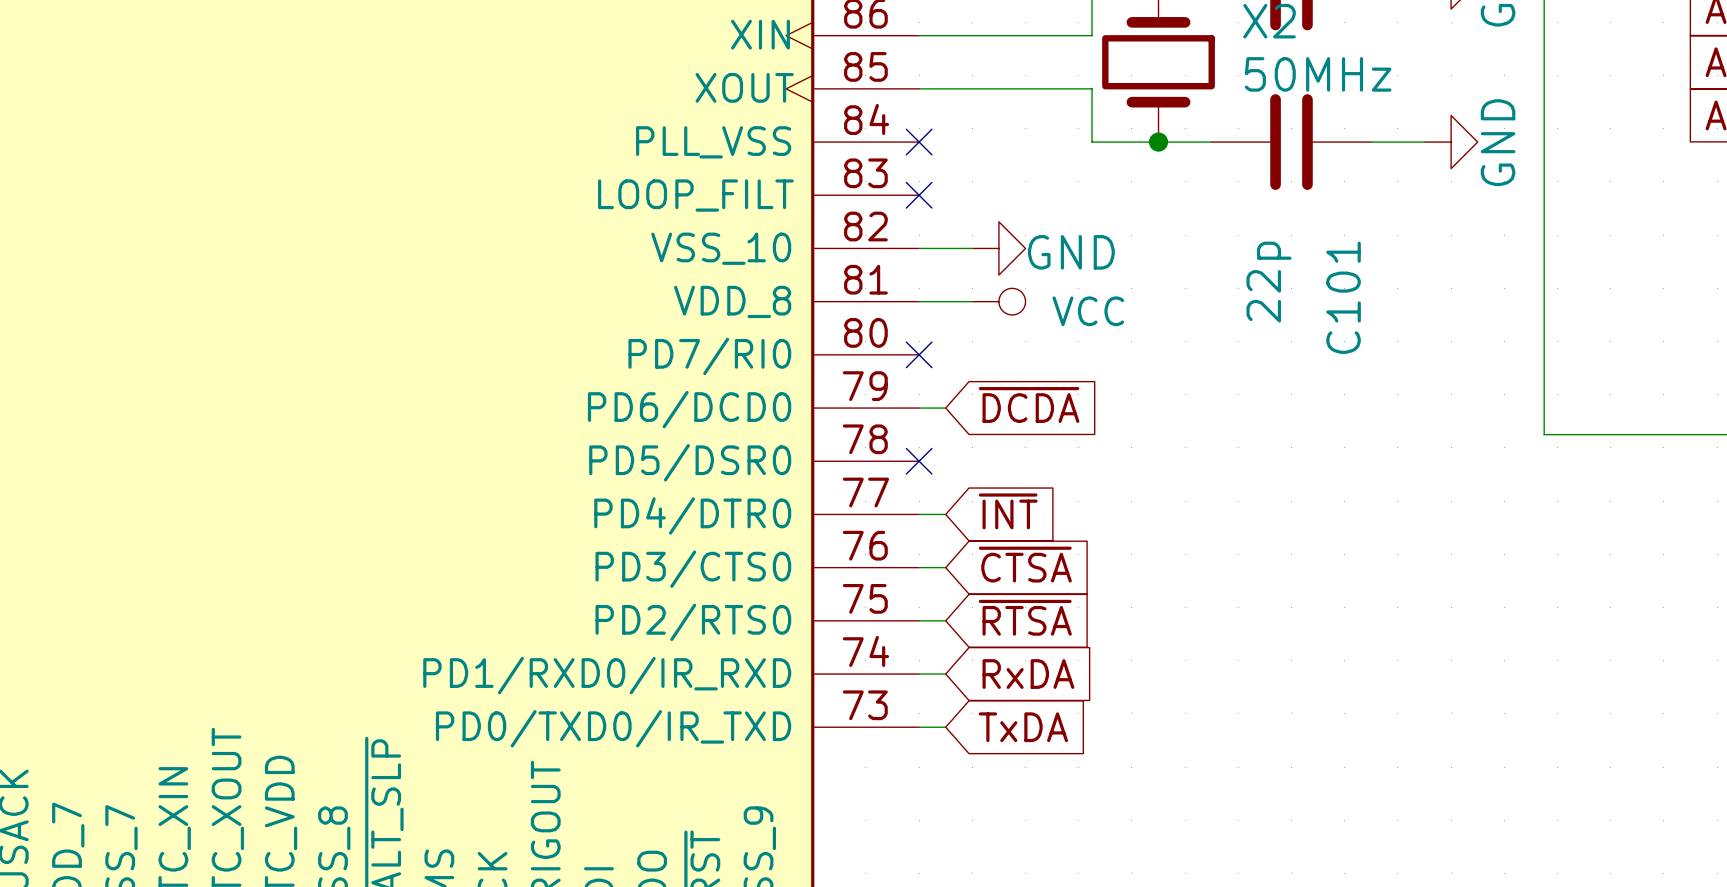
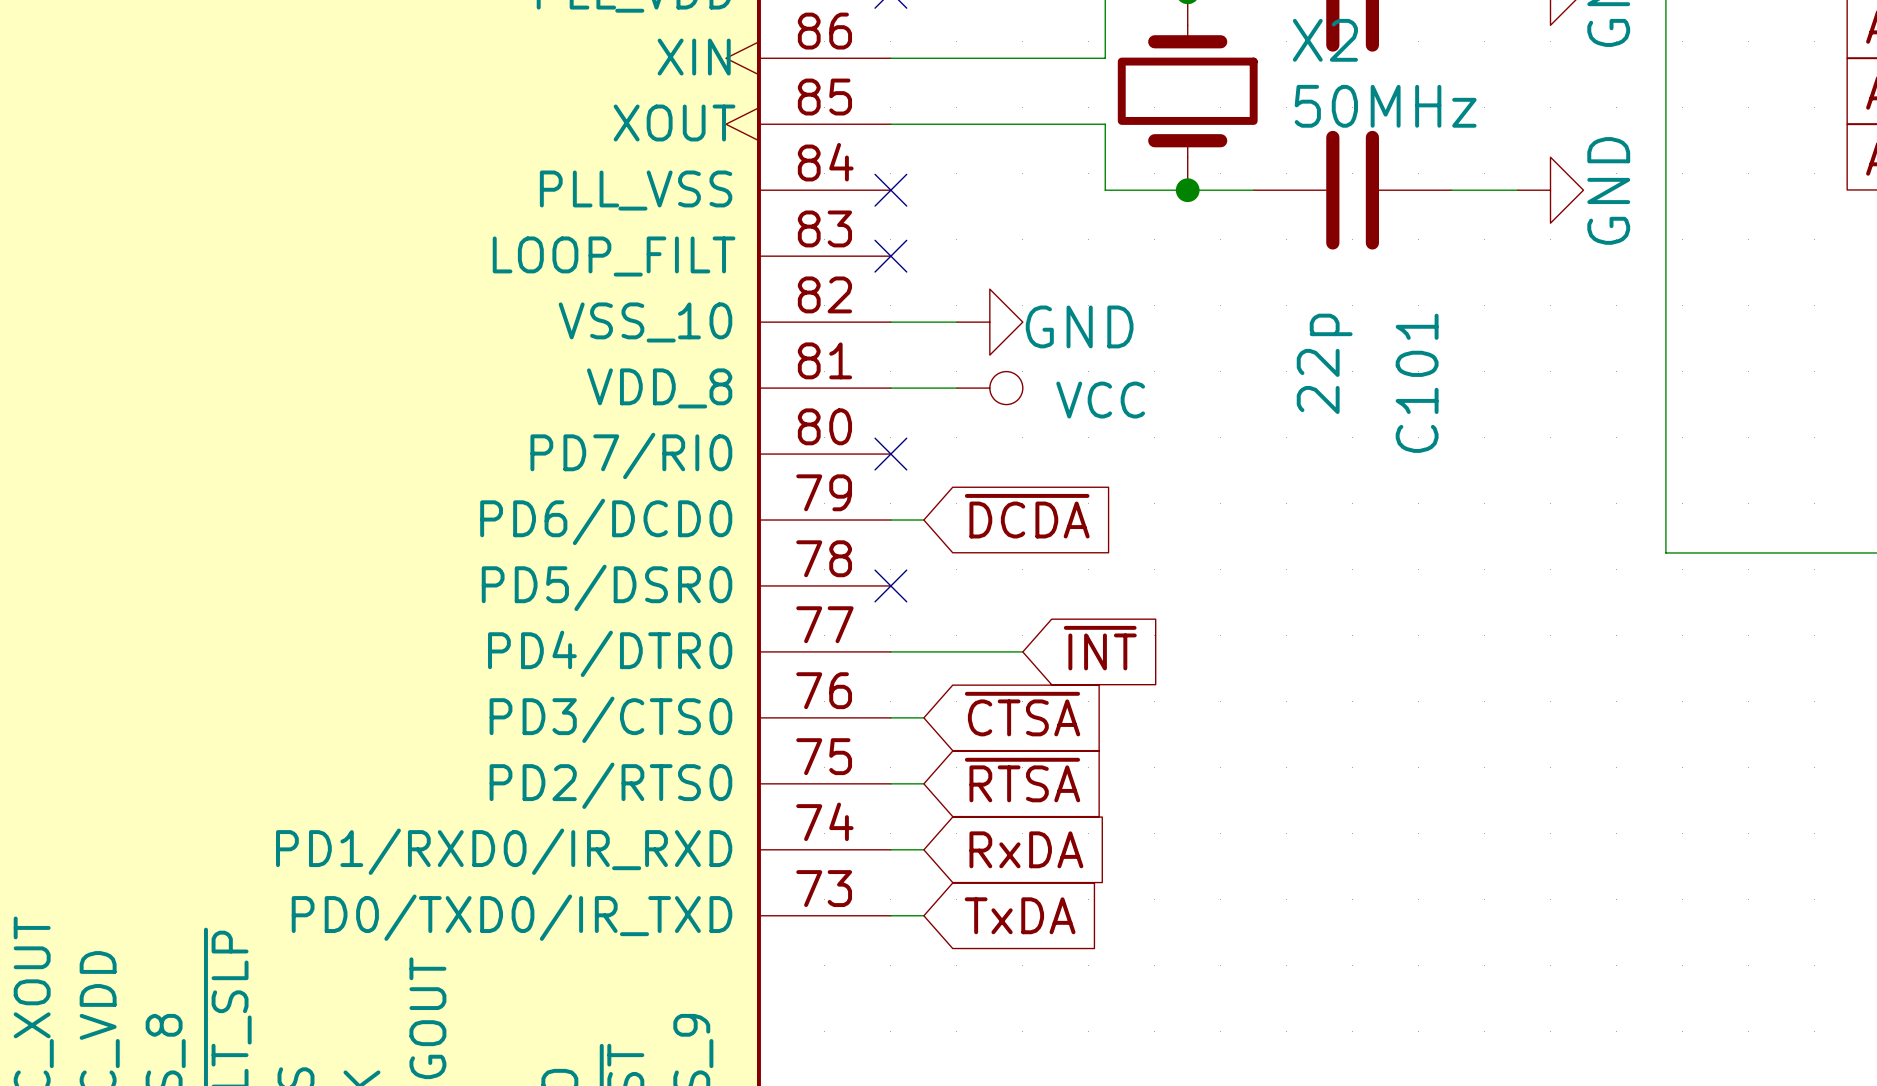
global label position: ~{INT} (1008, 511) -> ~{INT} (1100, 648)
wire: none -> (923, 651) (1022, 651)

